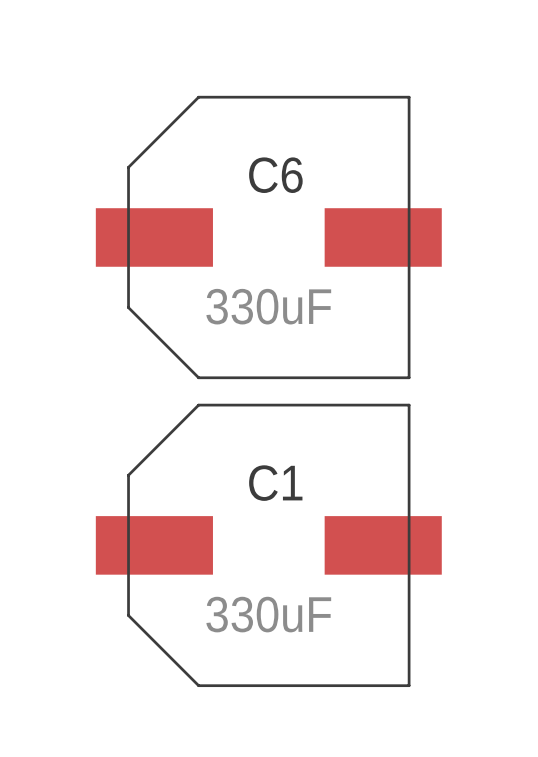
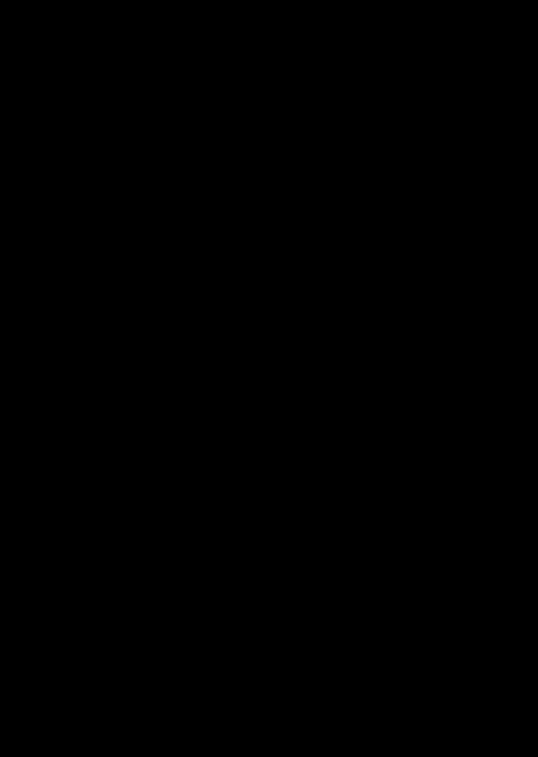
C6: 330uF (268, 237) -> none
C1: 330uF (268, 545) -> none

